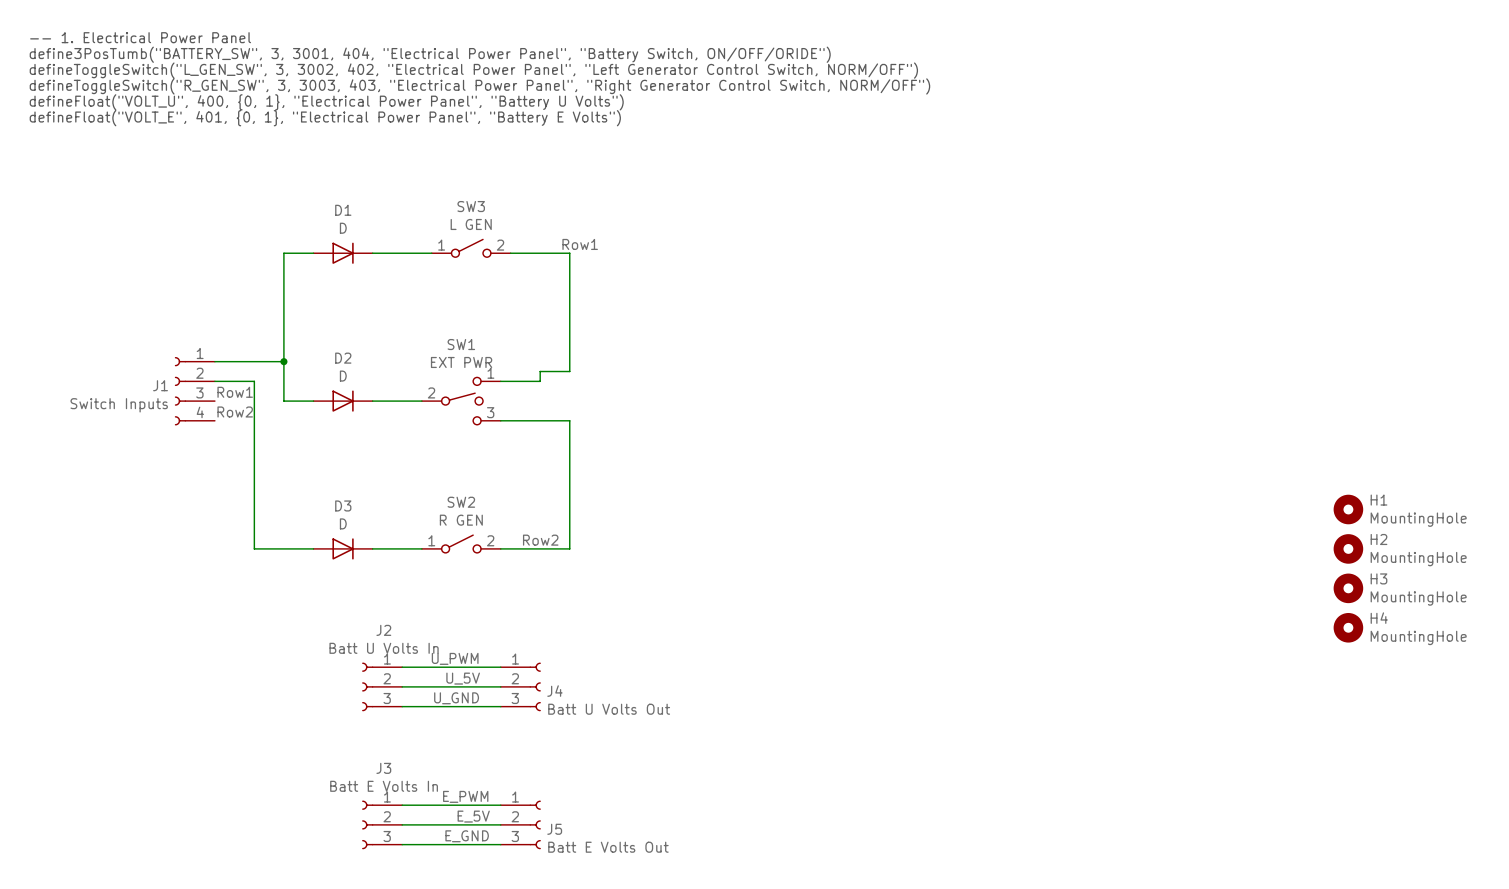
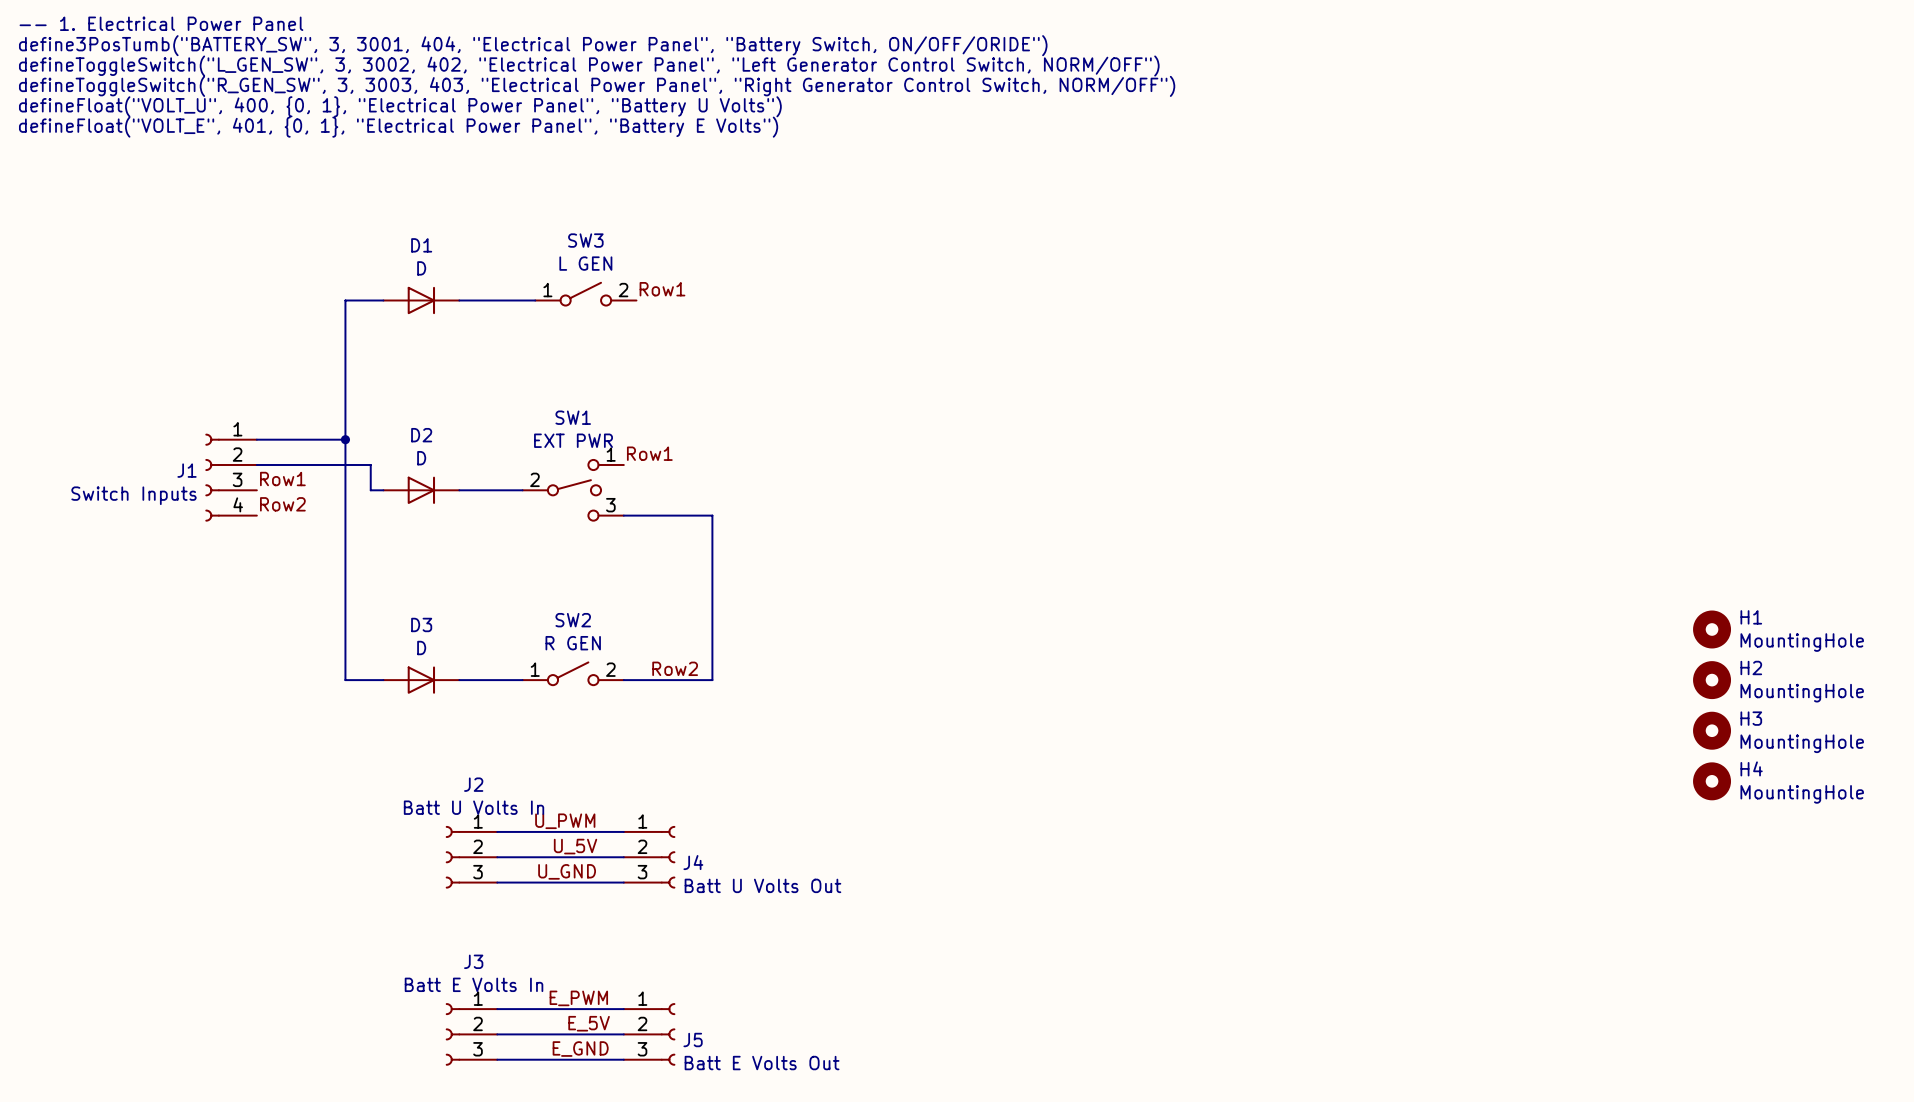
label position: Row1 (580, 244) -> Row1 (662, 289)
wire: (510, 253) (569, 253) (569, 371) (540, 371) (540, 381) (500, 381) -> none
label: none -> Row1 (649, 453)
wire: (254, 381) (254, 548) (283, 548) -> (345, 490) (345, 680)
wire: (283, 401) (303, 401) -> (307, 464) (370, 464) (370, 490)

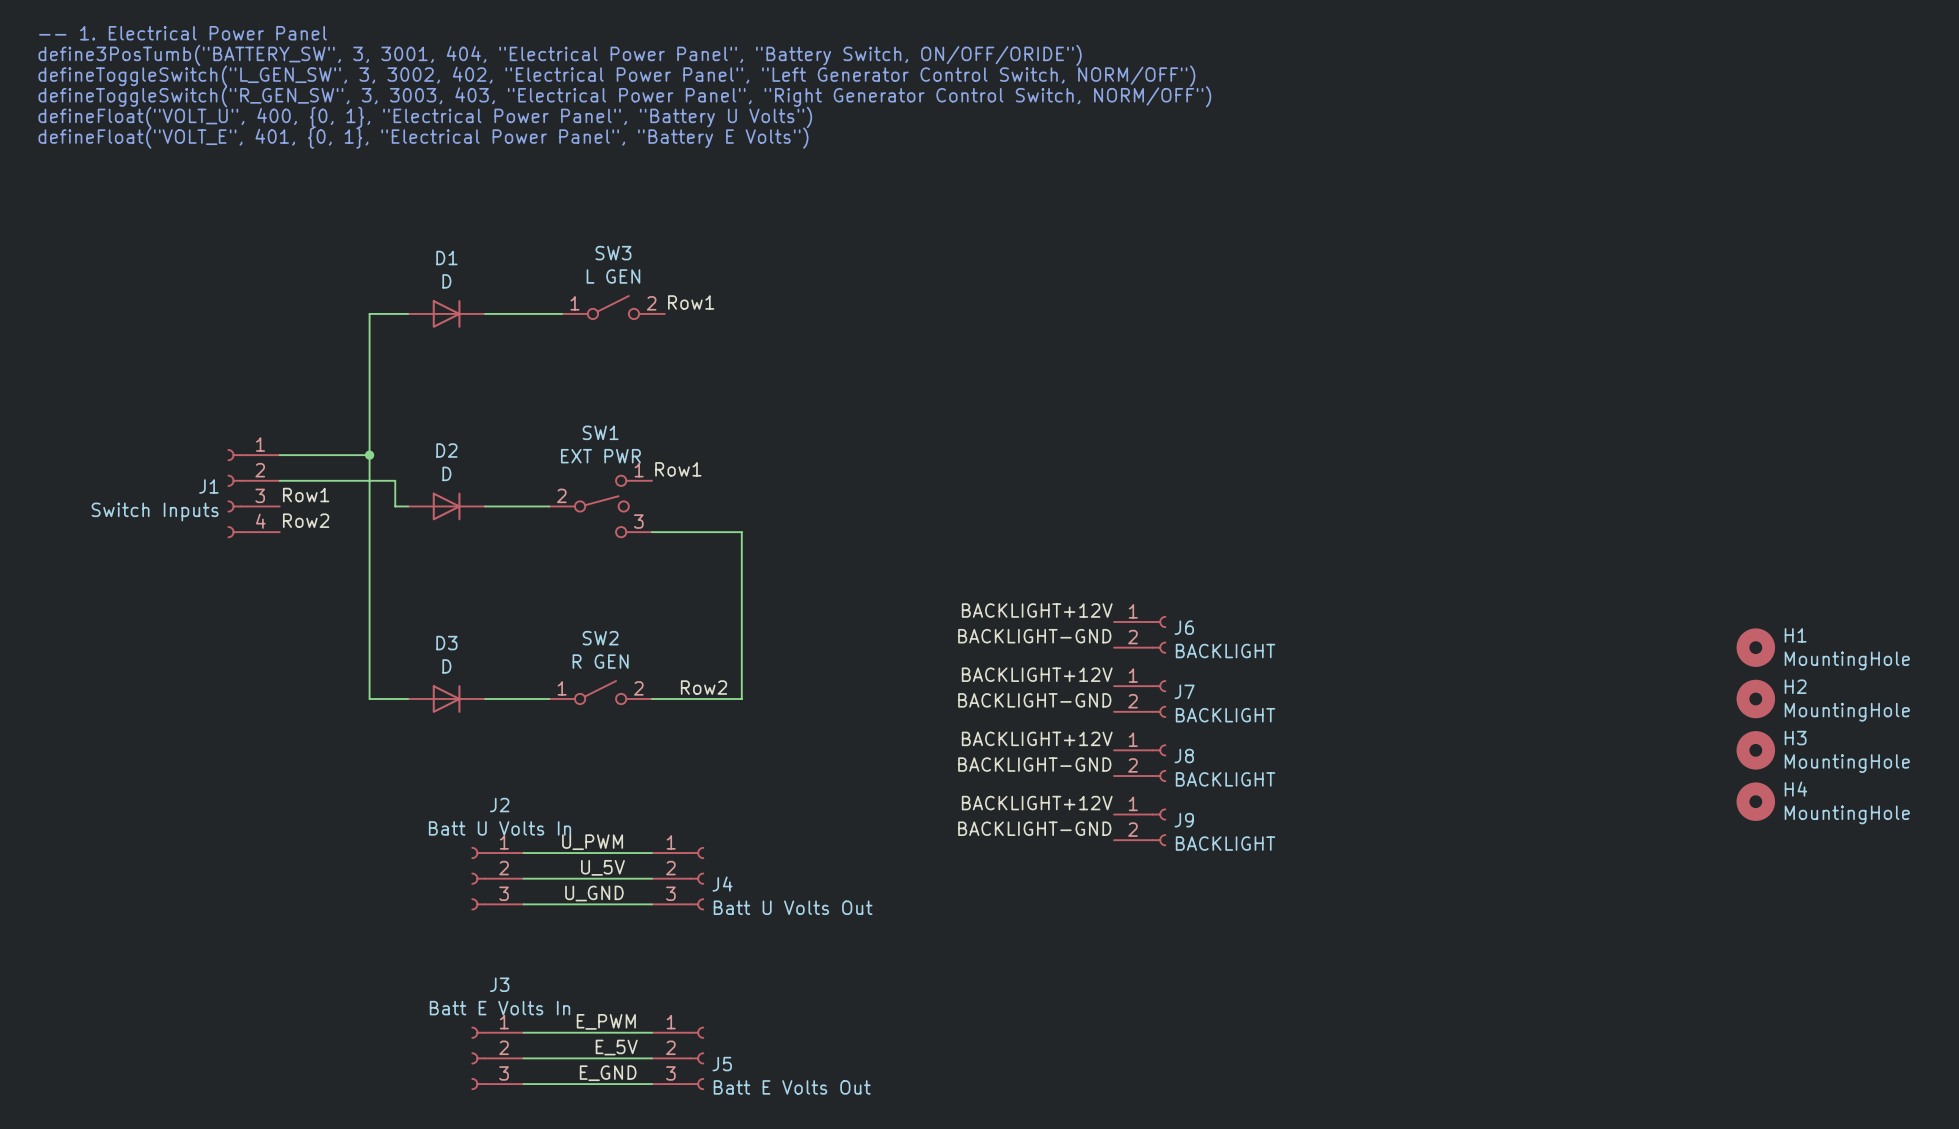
label: none -> BACKLIGHT+12V (1037, 610)
J6: none -> BACKLIGHT (1140, 634)
label: none -> BACKLIGHT-GND (1034, 636)
label: none -> BACKLIGHT+12V (1037, 674)
J7: none -> BACKLIGHT (1140, 699)
label: none -> BACKLIGHT-GND (1034, 700)
label: none -> BACKLIGHT+12V (1037, 738)
J8: none -> BACKLIGHT (1140, 763)
label: none -> BACKLIGHT-GND (1034, 764)
label: none -> BACKLIGHT+12V (1037, 803)
J9: none -> BACKLIGHT (1140, 827)
label: none -> BACKLIGHT-GND (1034, 828)

